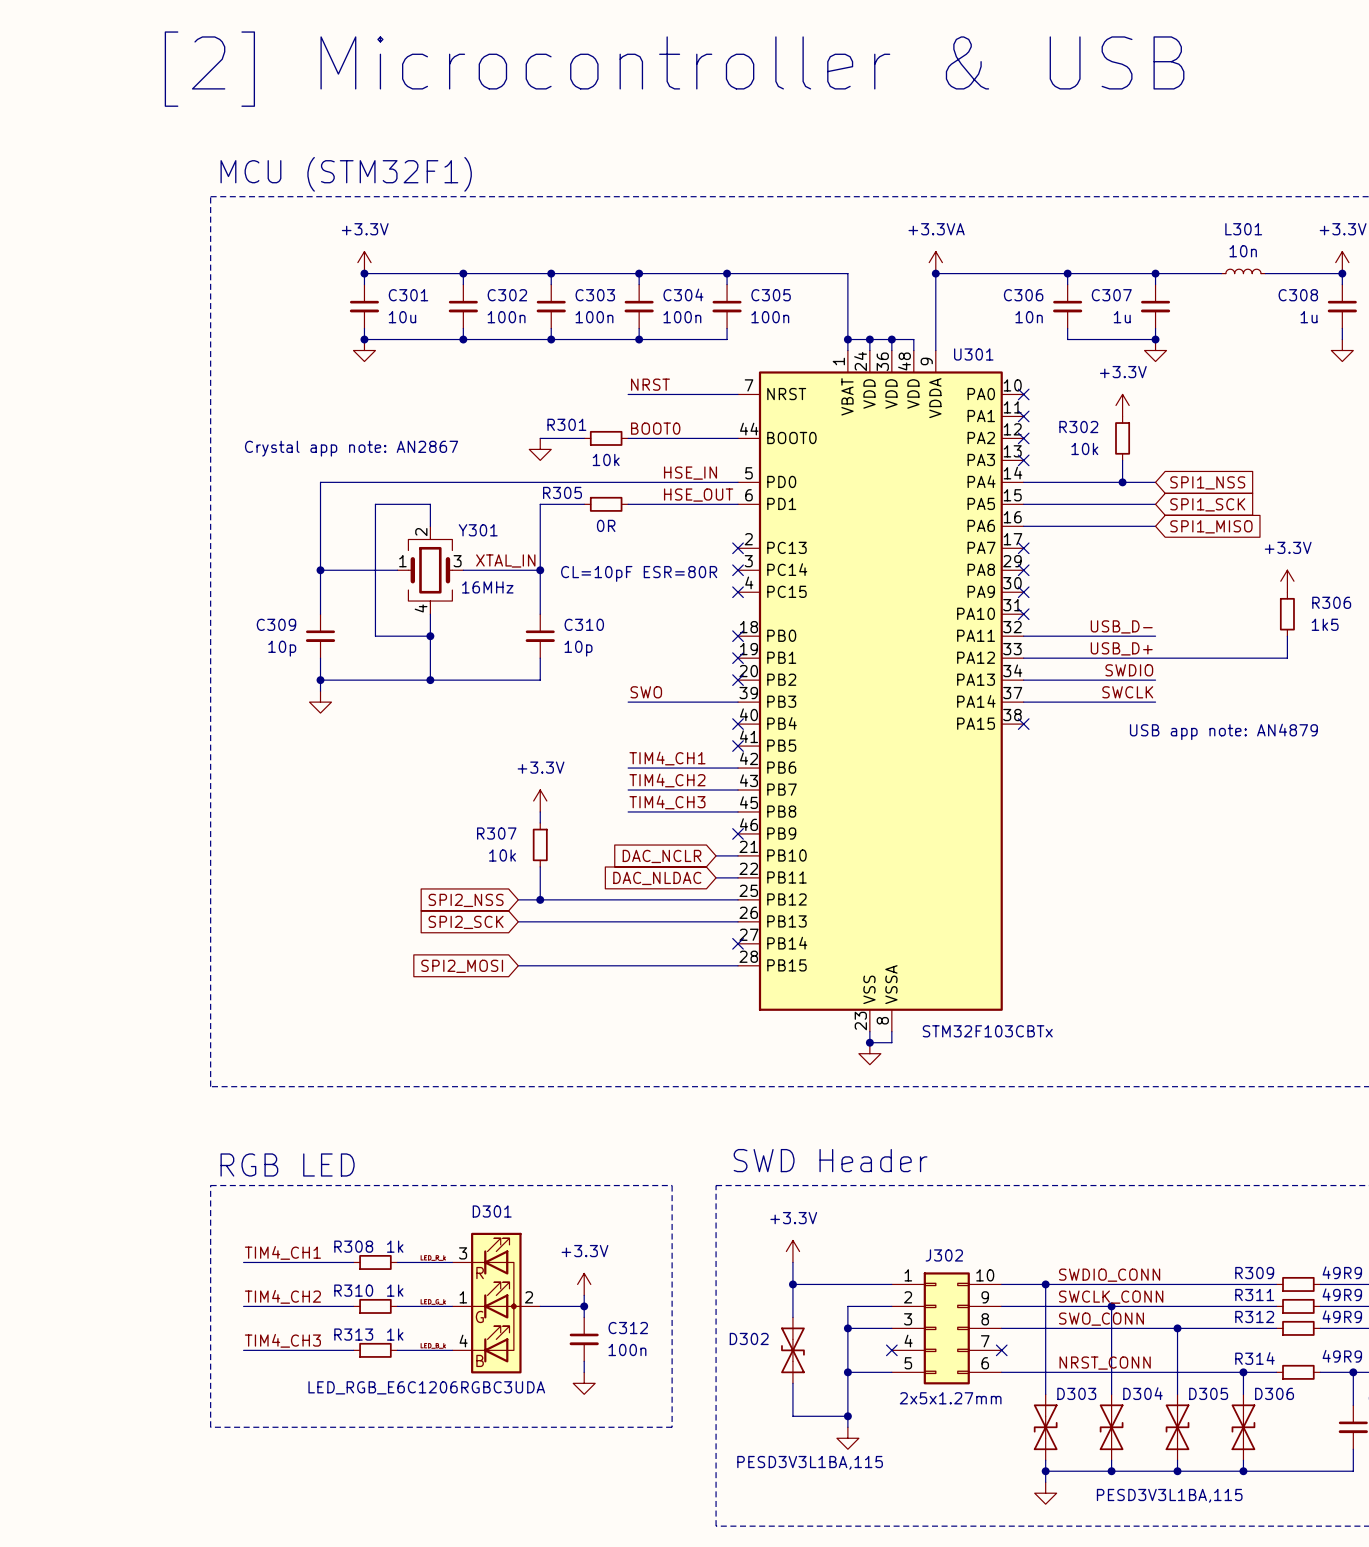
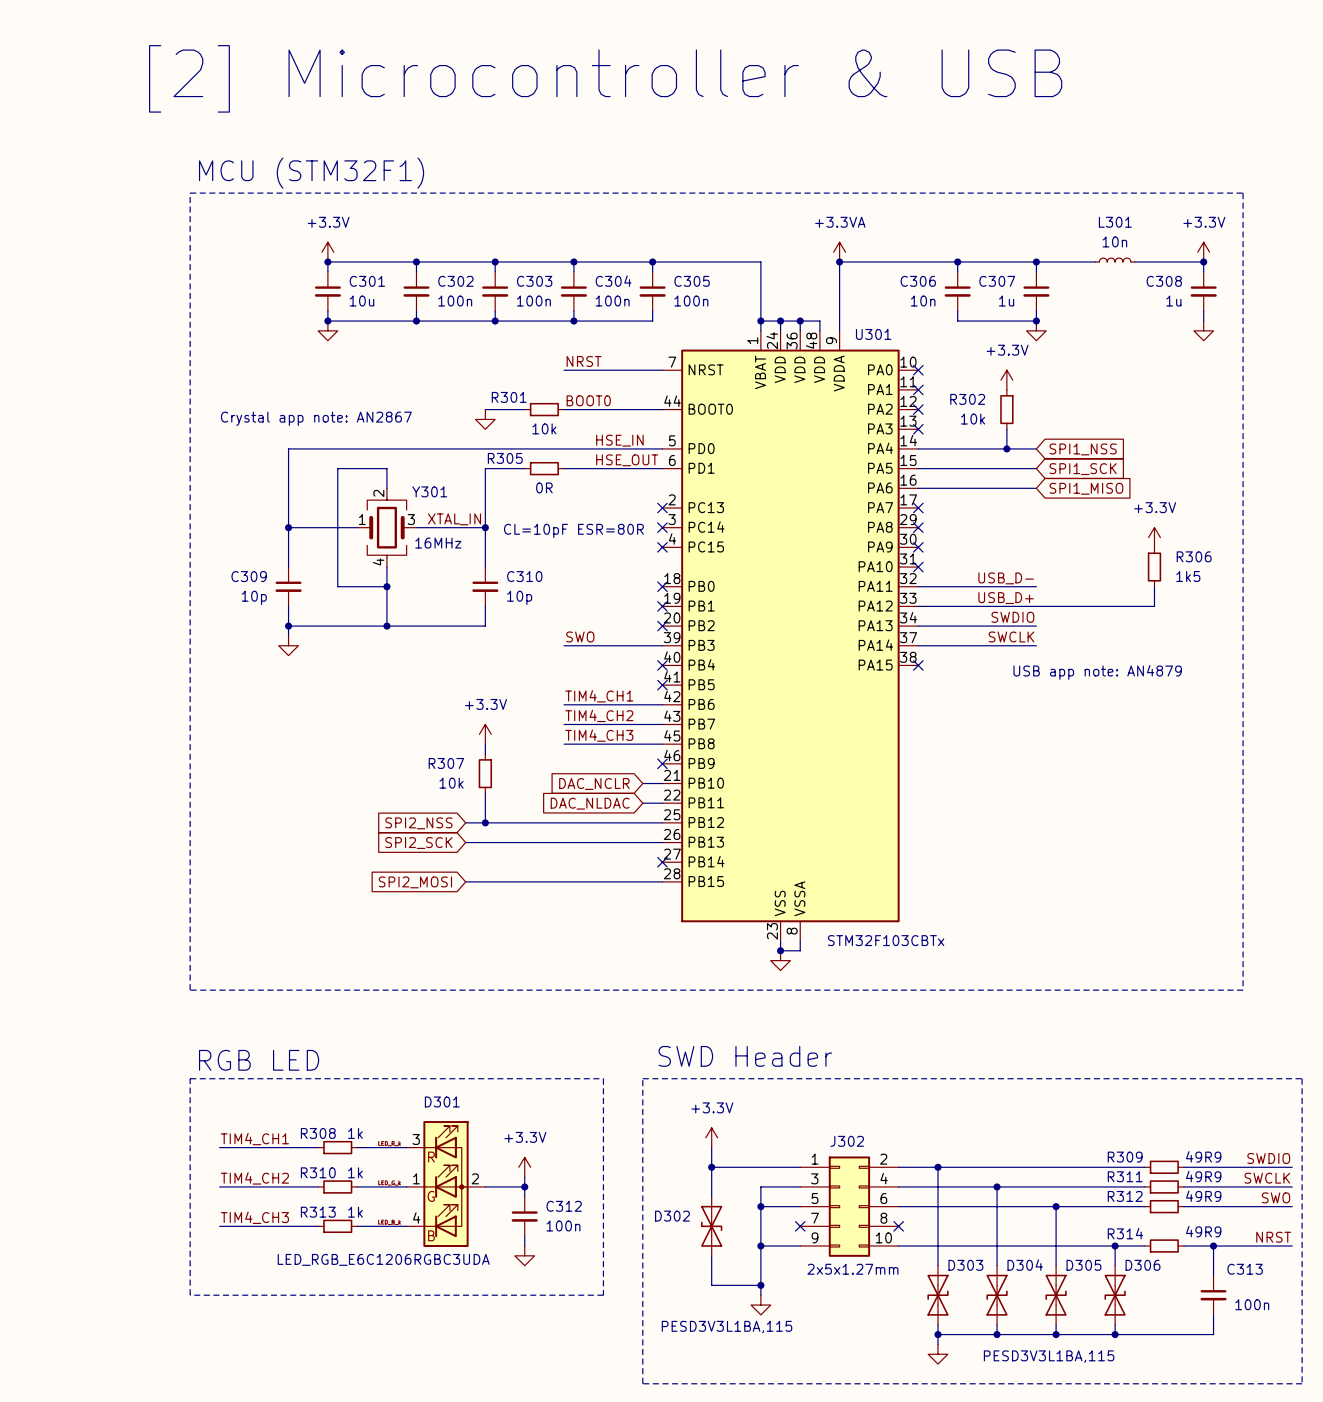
J302 symbol: [891, 1272, 1002, 1385] -> [800, 1156, 899, 1257]
label: SWDIO_CONN (1109, 1275) -> none
label: SWCLK_CONN (1111, 1297) -> none
label: SWO_CONN (1101, 1319) -> none
label: NRST_CONN (1105, 1363) -> none

